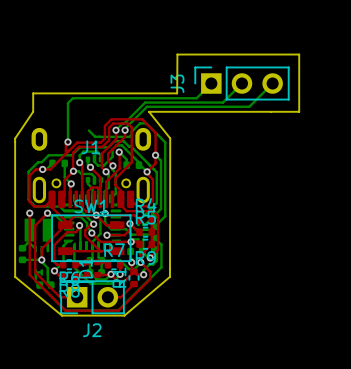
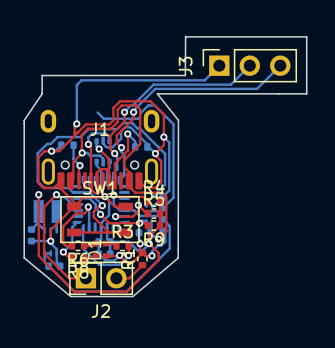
R7 name: R7 (114, 250) -> R3 (122, 231)

